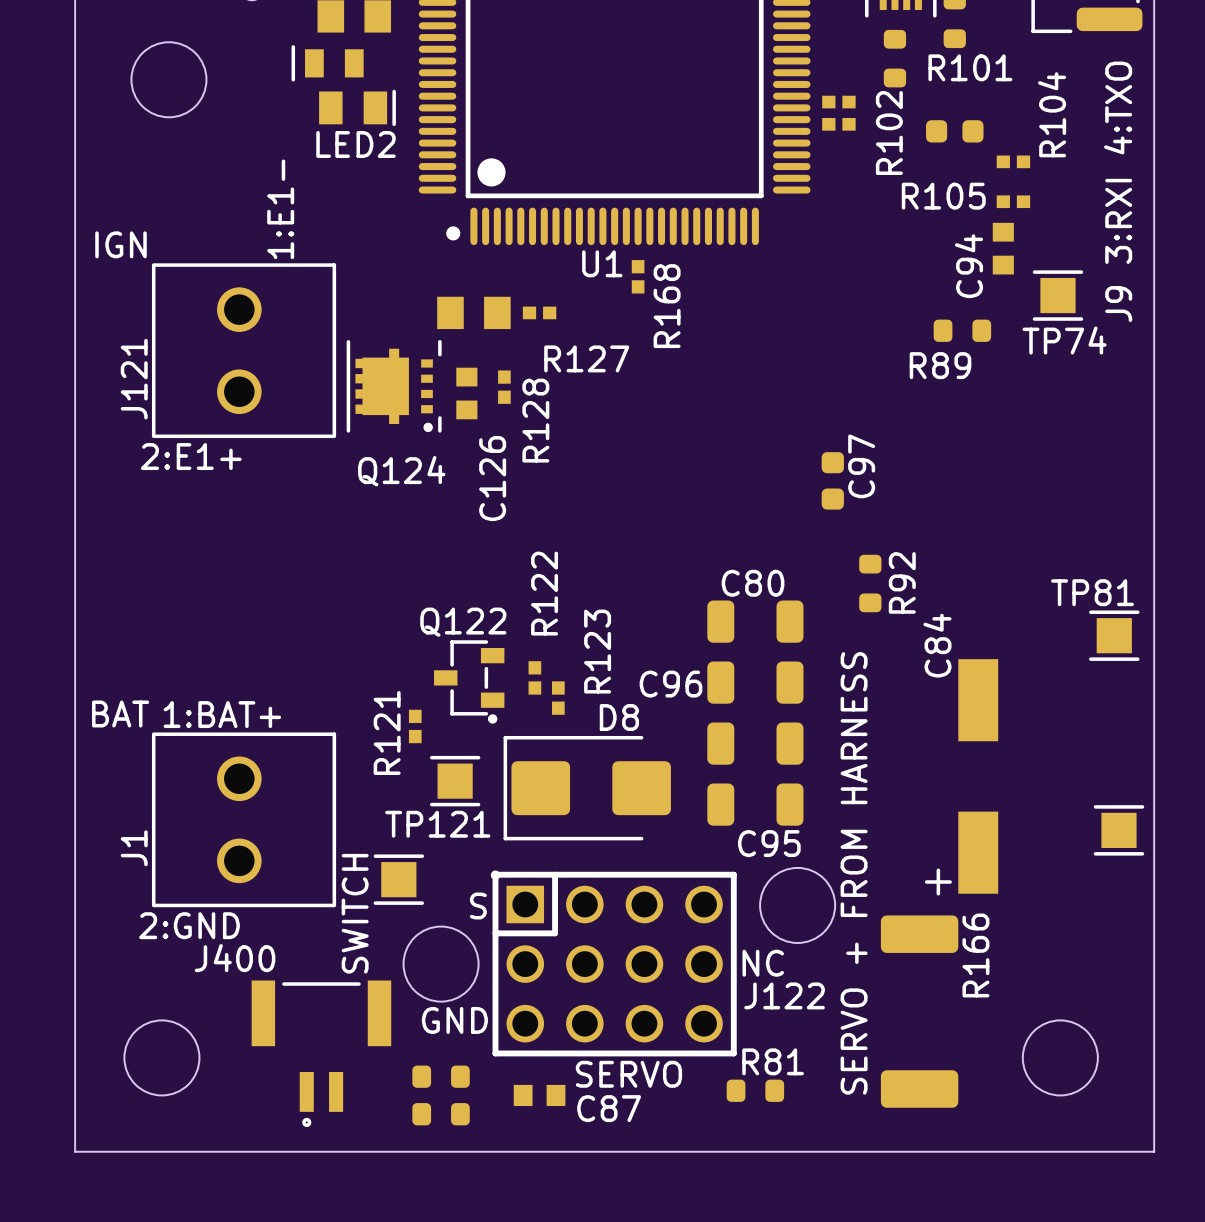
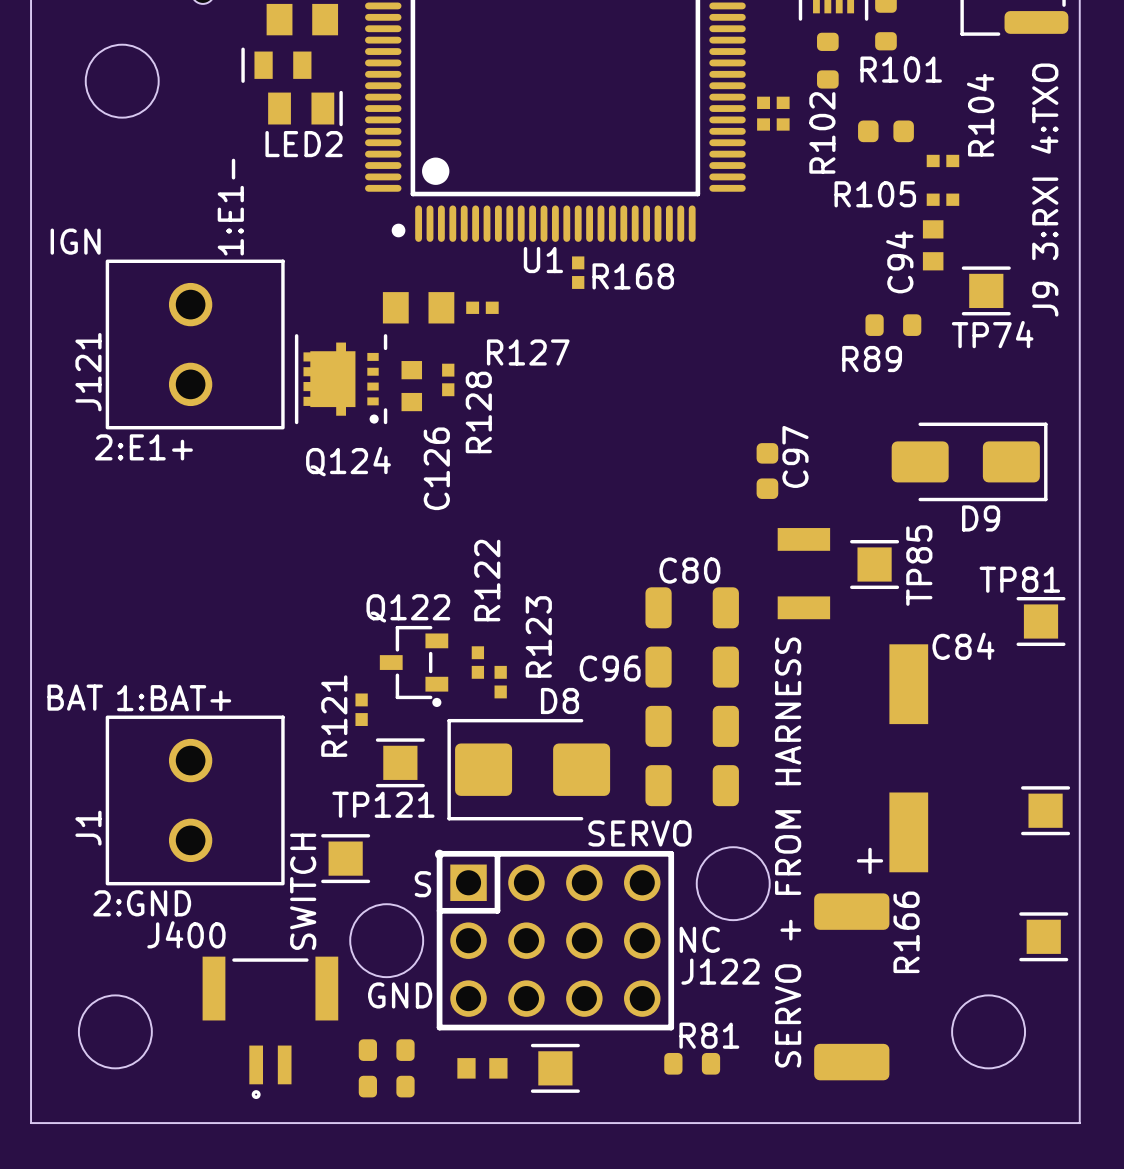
R168 name rotation: 0° (667, 306) -> 90° clockwise (633, 276)
D9: none -> (969, 461)
TP85: none -> (874, 564)
R92: (870, 583) -> none
part: none -> (803, 573)
C84 name rotation: 0° (937, 645) -> 90° clockwise (963, 646)
C84 name position: C84 (937, 645) -> C84 (963, 646)
C95 name: C95 (769, 843) -> none
part: none -> (1043, 936)
text position: SERVO (628, 1074) -> SERVO (639, 833)
part: none -> (555, 1068)
C87 name: C87 (609, 1108) -> none

